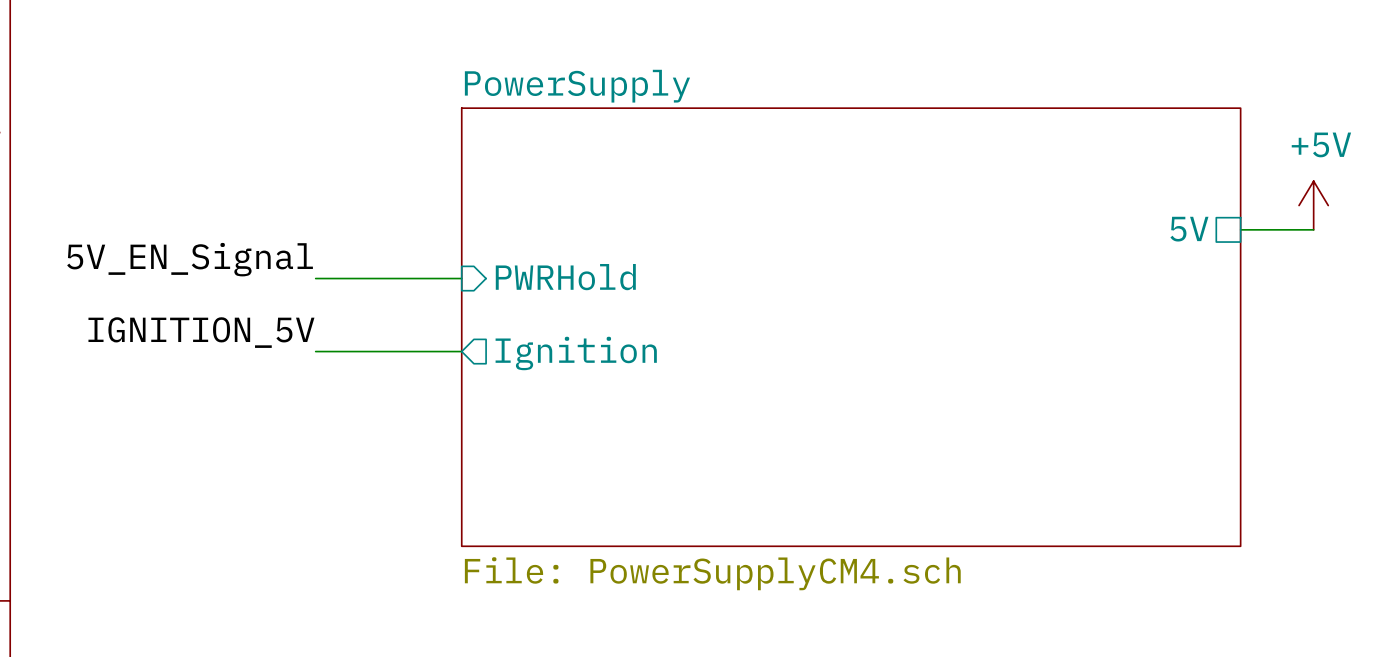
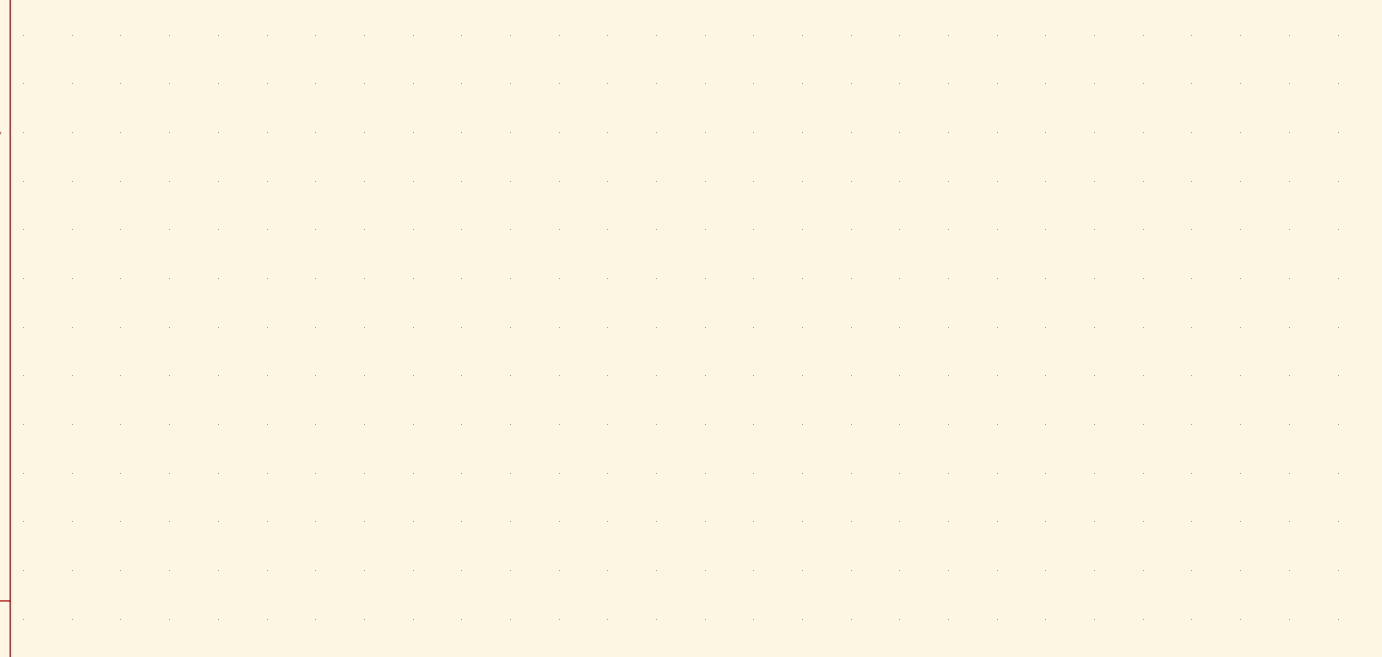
power symbol: +5V (1313, 205) -> none
sheet pin: 5V (1189, 229) -> none
wire: (1240, 229) (1313, 229) -> none
label: 5V_EN_Signal (190, 259) -> none
sheet pin: PWRHold (565, 277) -> none
wire: (315, 278) (461, 278) -> none
sheet PowerSupply: File: PowerSupplyCM4.sch (851, 327) -> none
label: IGNITION_5V (201, 332) -> none
wire: (315, 351) (461, 351) -> none
sheet pin: Ignition (576, 353) -> none

